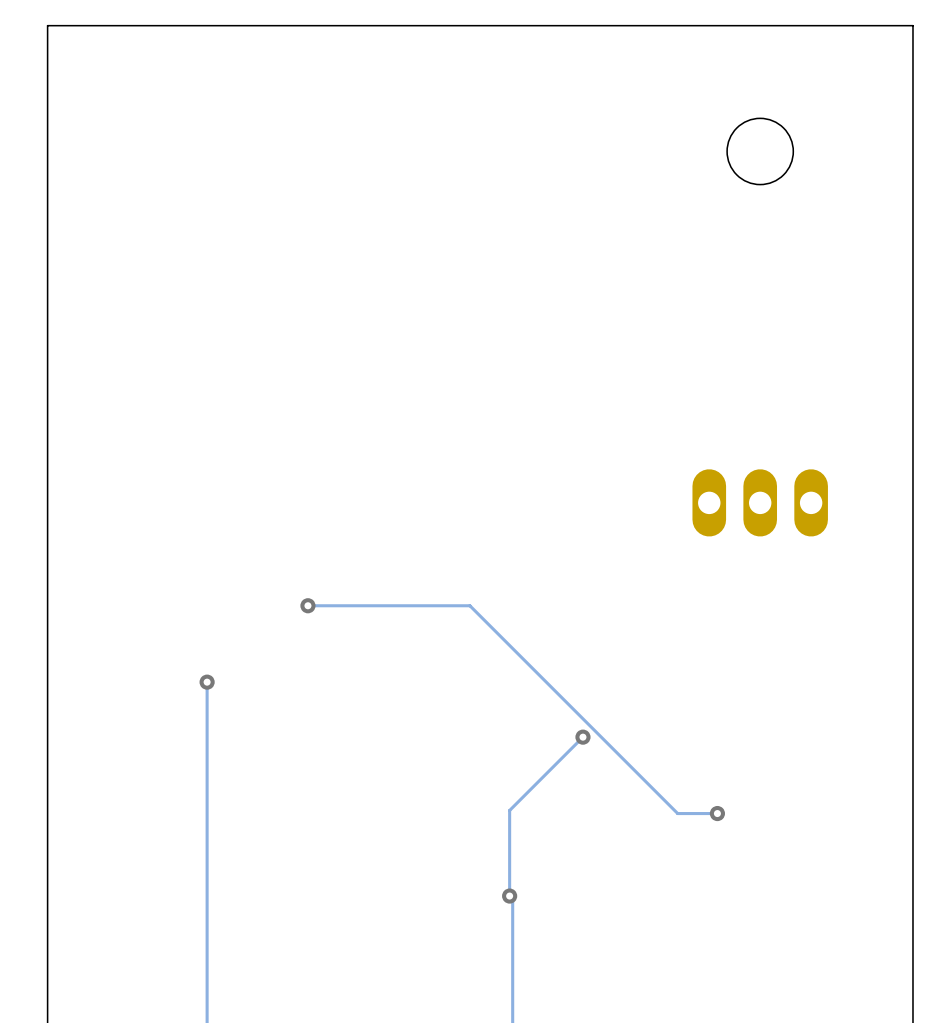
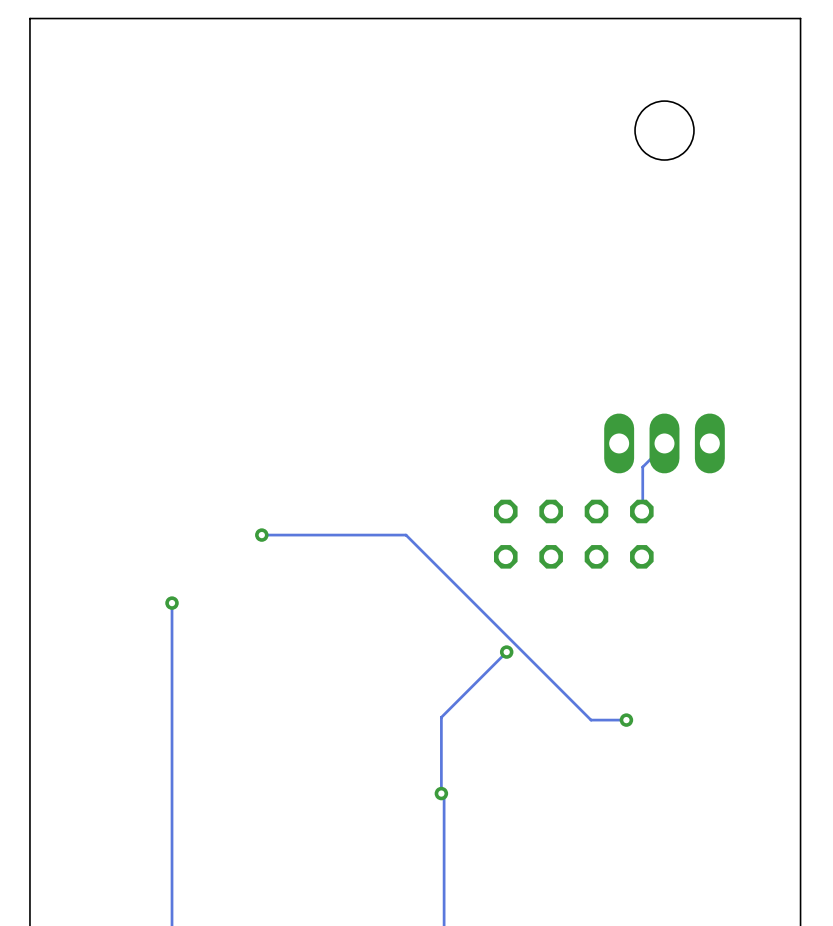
track: none -> (664, 443) (642, 467) (641, 511)
part: none -> (573, 534)

